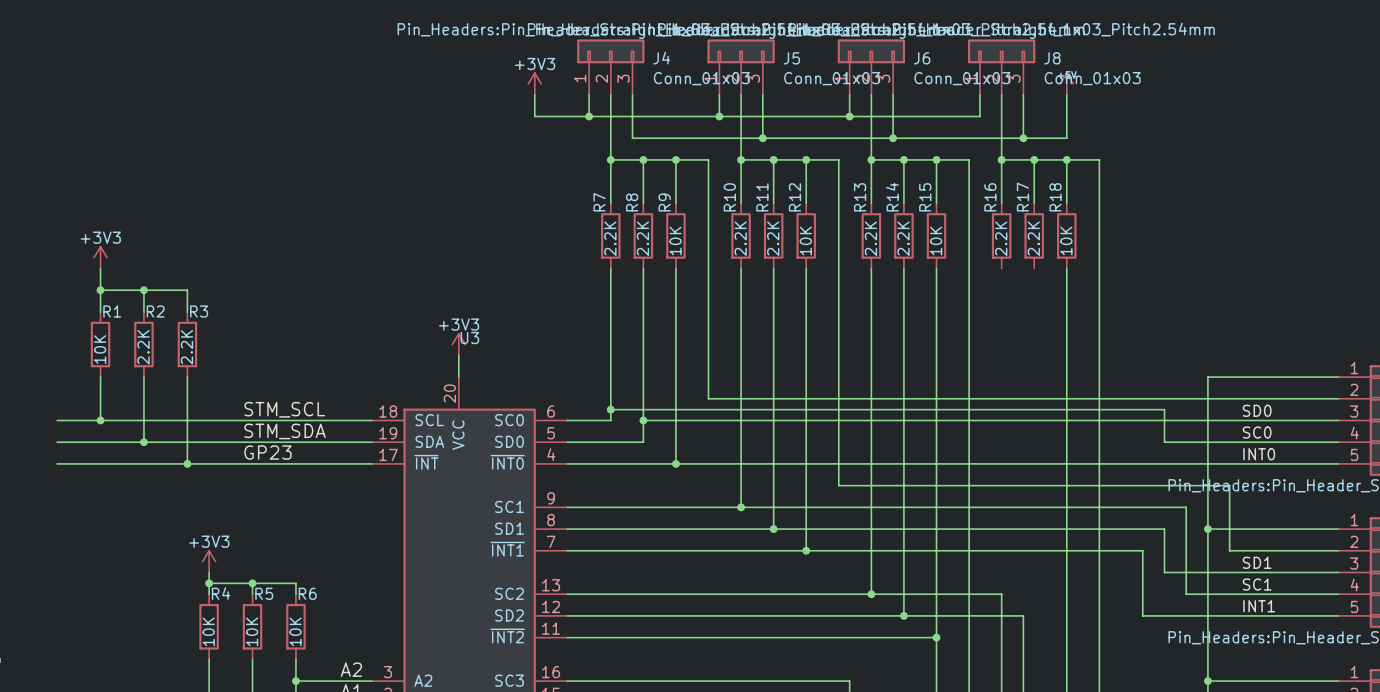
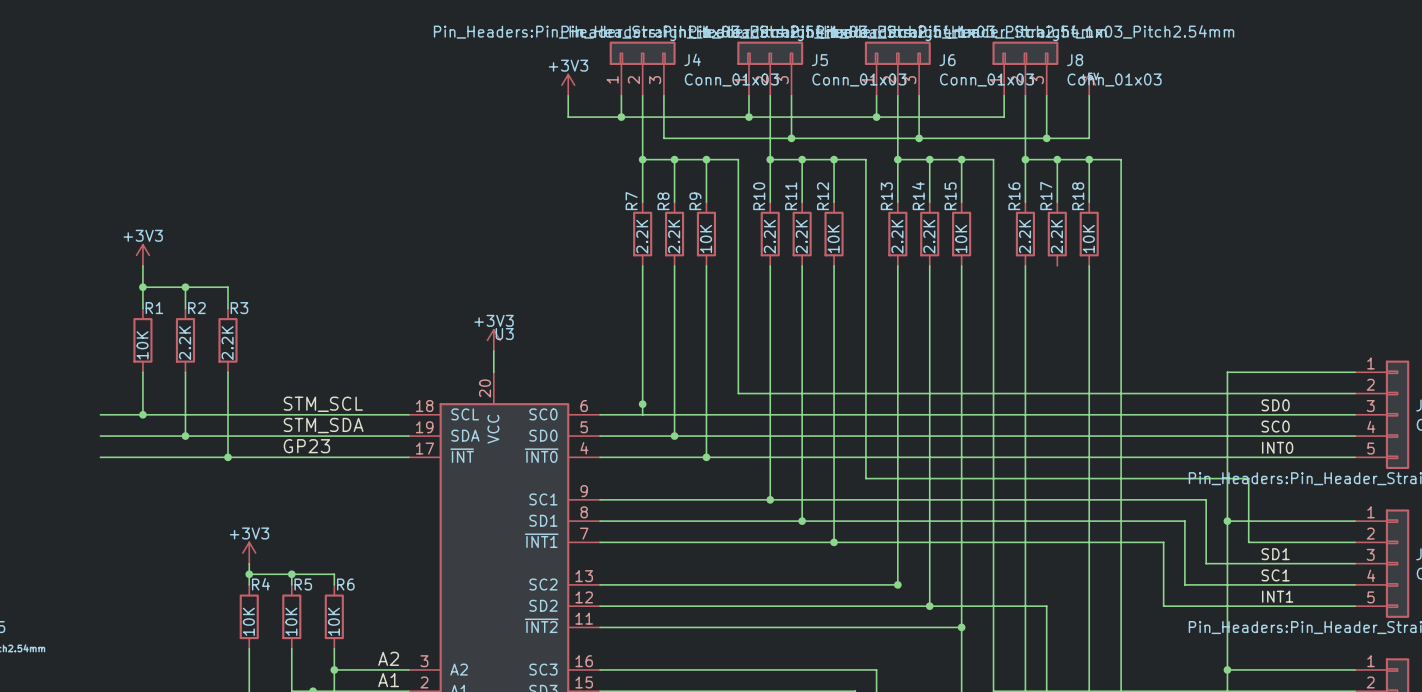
wire: (610, 409) (1164, 409) (1164, 442) -> (674, 436) (1184, 436)
wire: none -> (642, 414) (674, 414)
junction position: (643, 420) -> (674, 436)
wire: (1164, 572) (1186, 572) (1186, 594) -> (1184, 563) (1184, 584) (1206, 584)
wire: (871, 594) (1001, 594) -> (1025, 265) (1025, 584)

